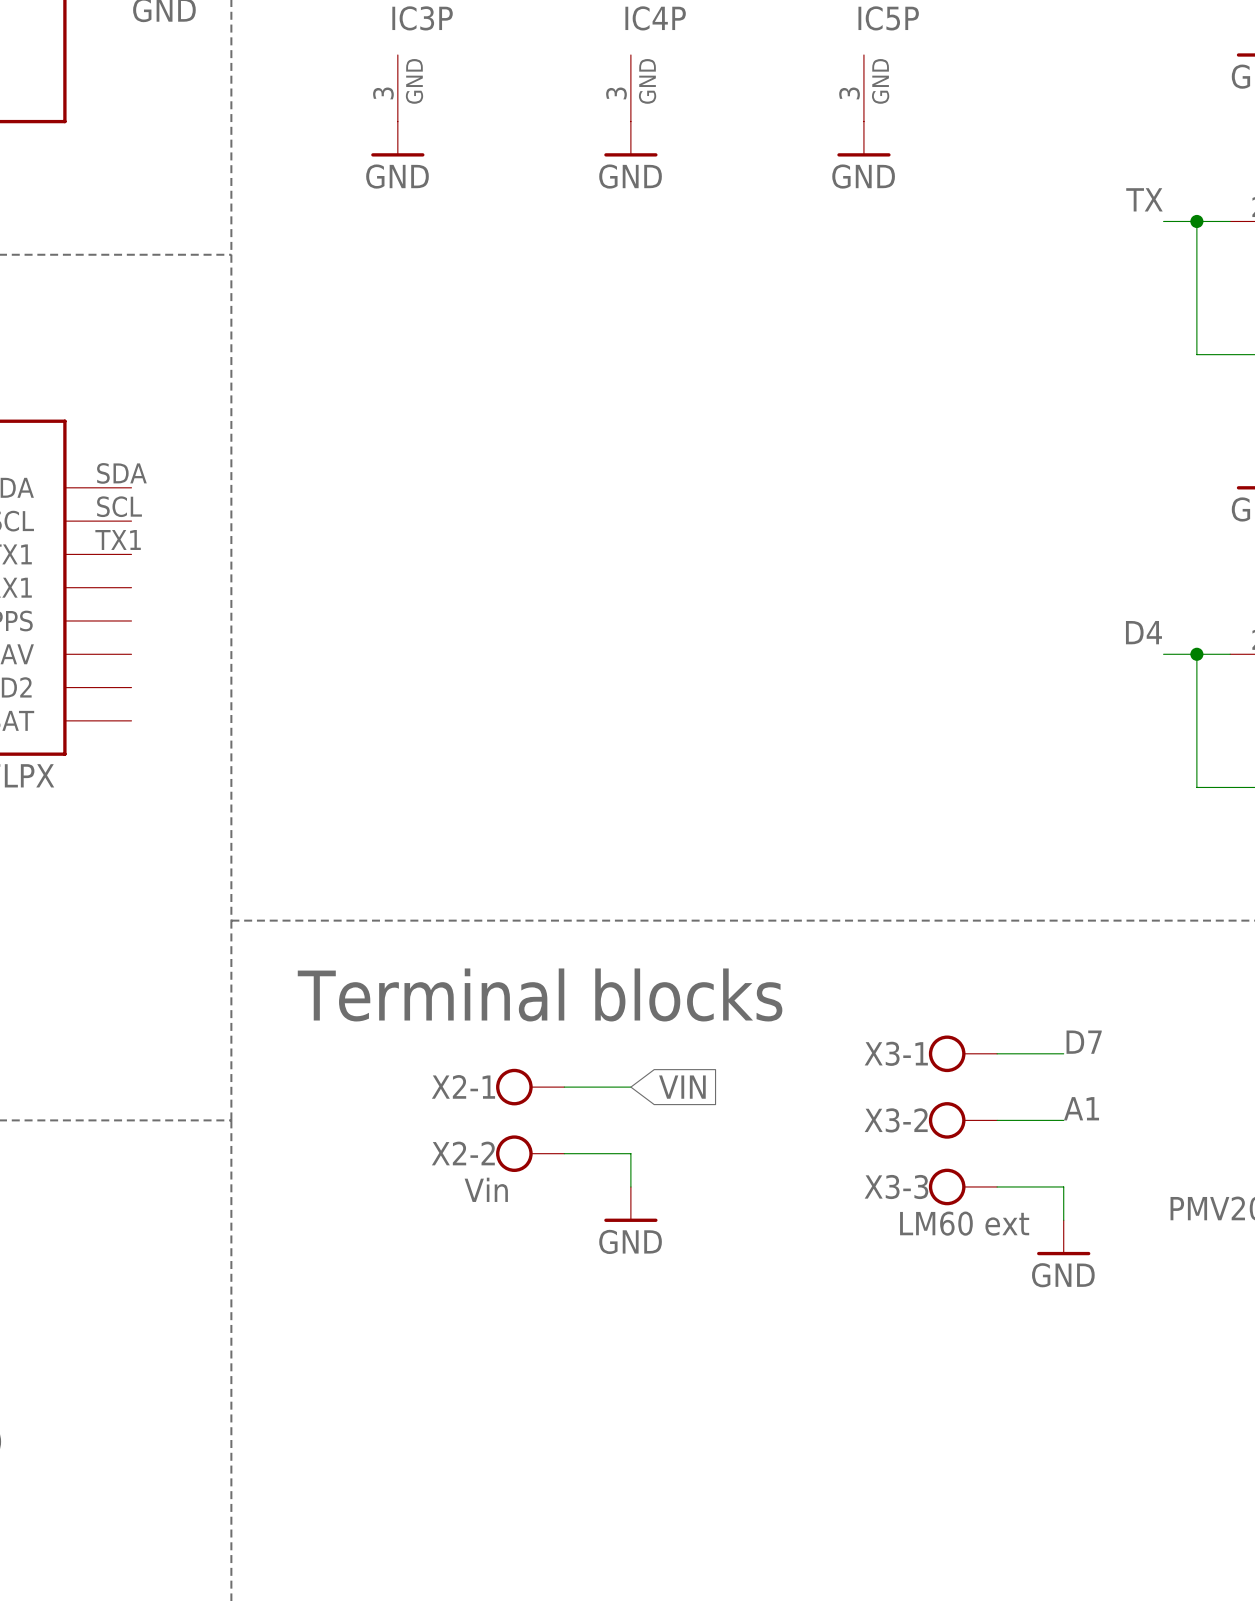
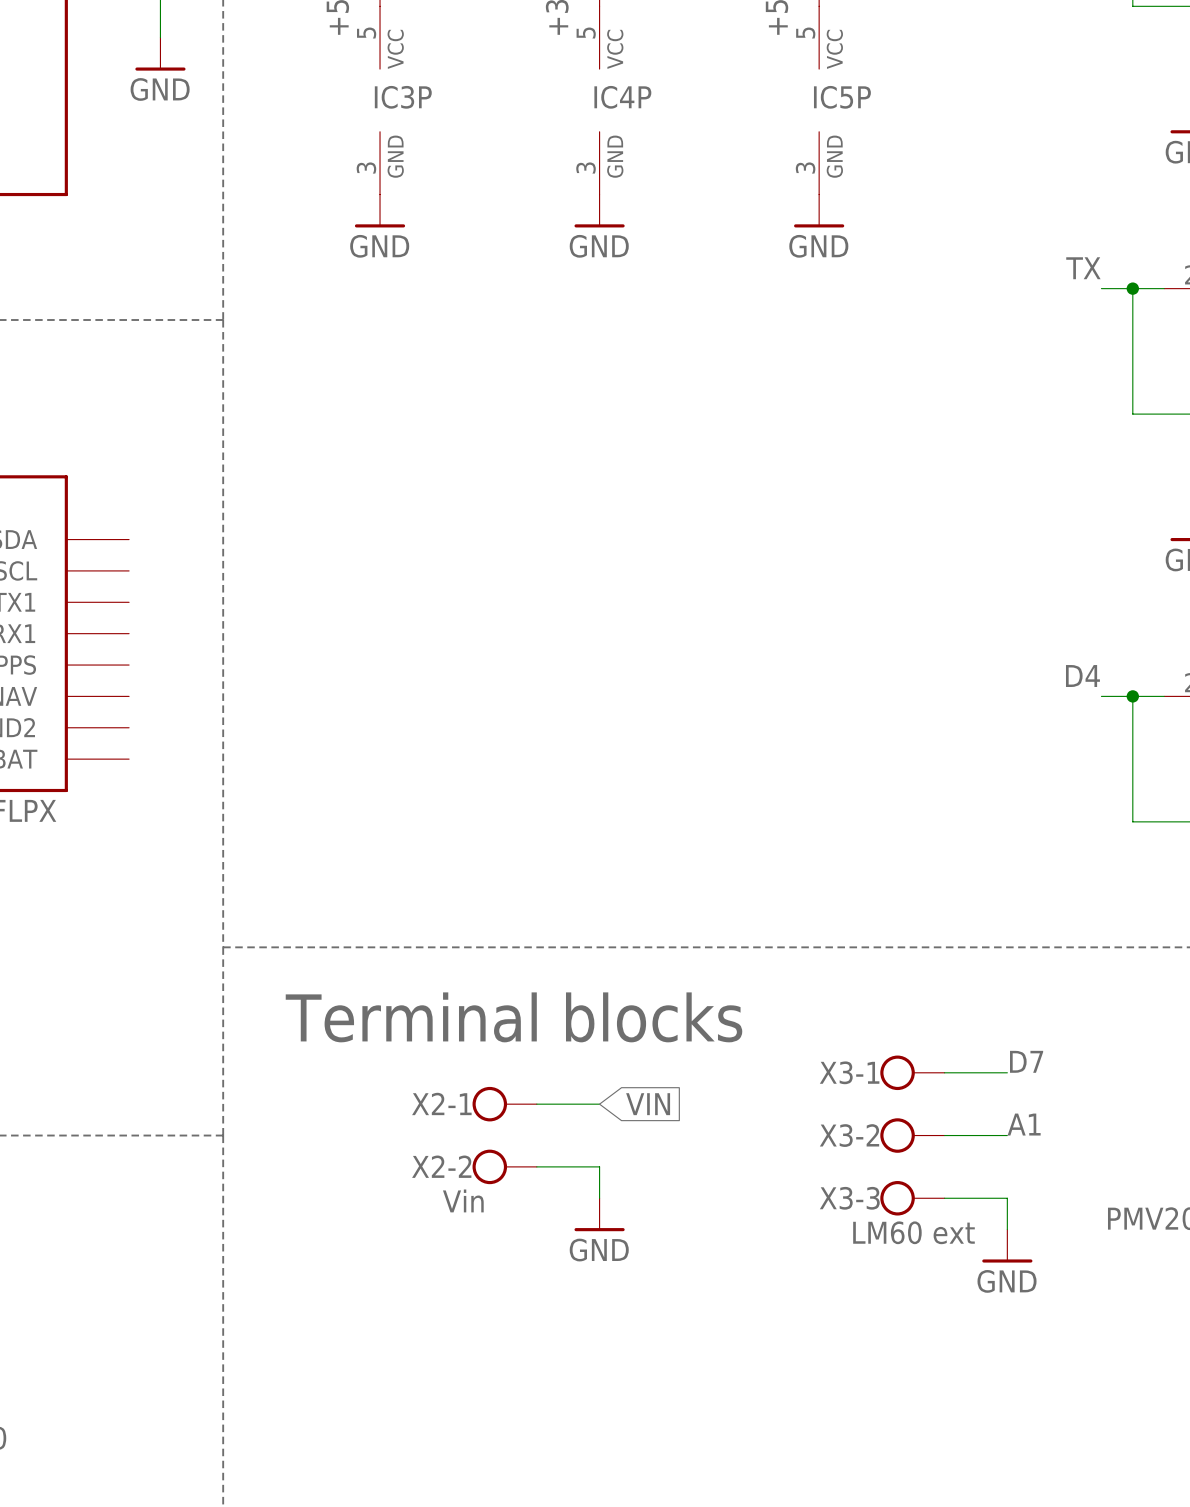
part pin number: SDA (121, 473) -> none
part pin number: SCL (119, 506) -> none
part pin number: TX1 (118, 539) -> none

